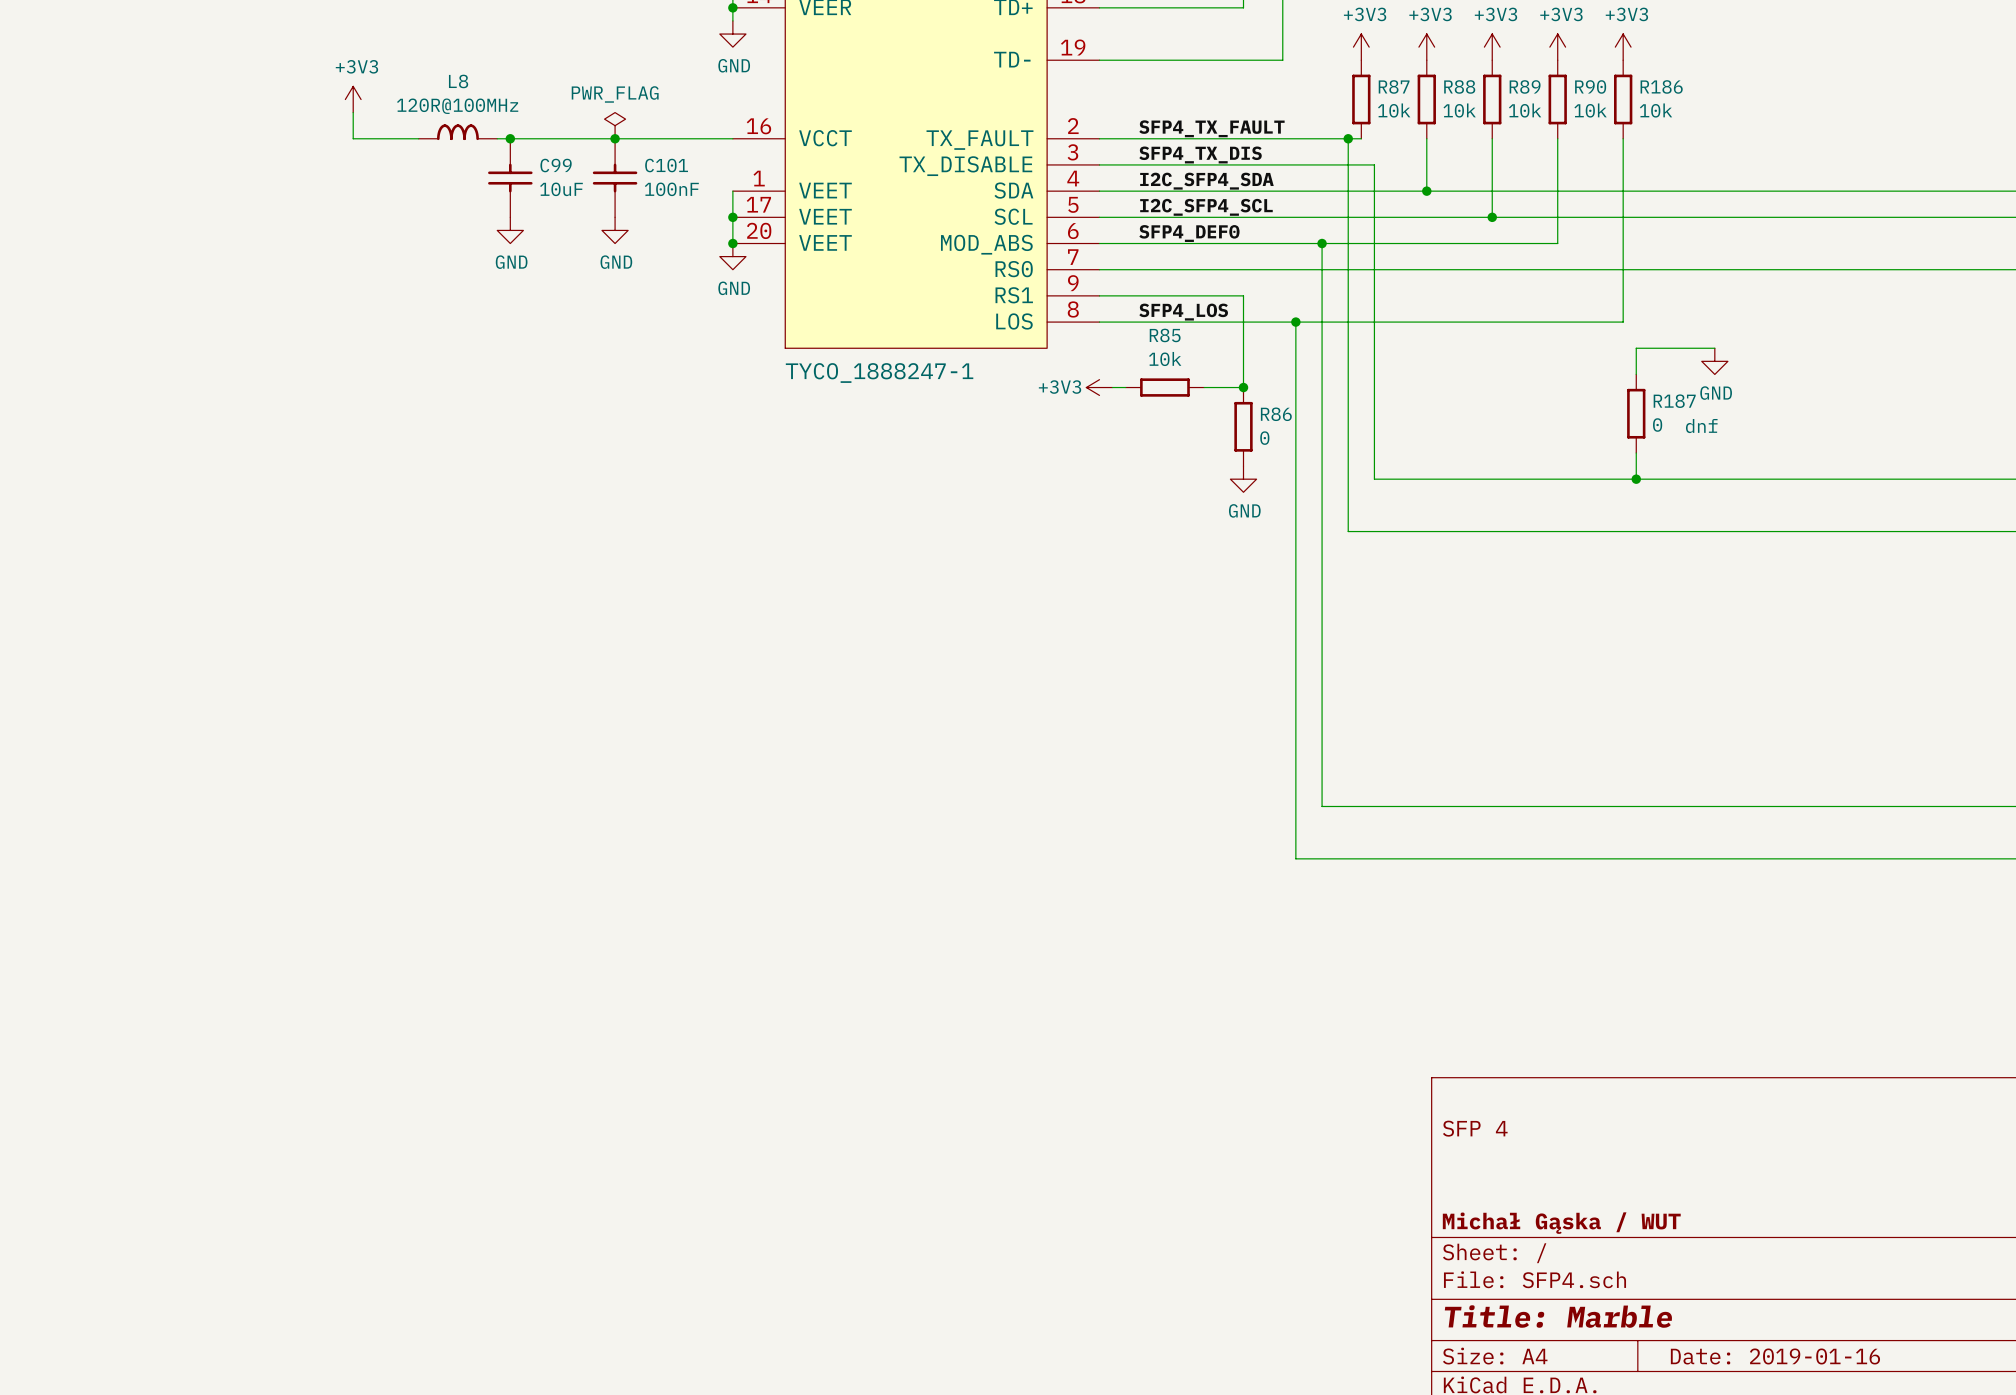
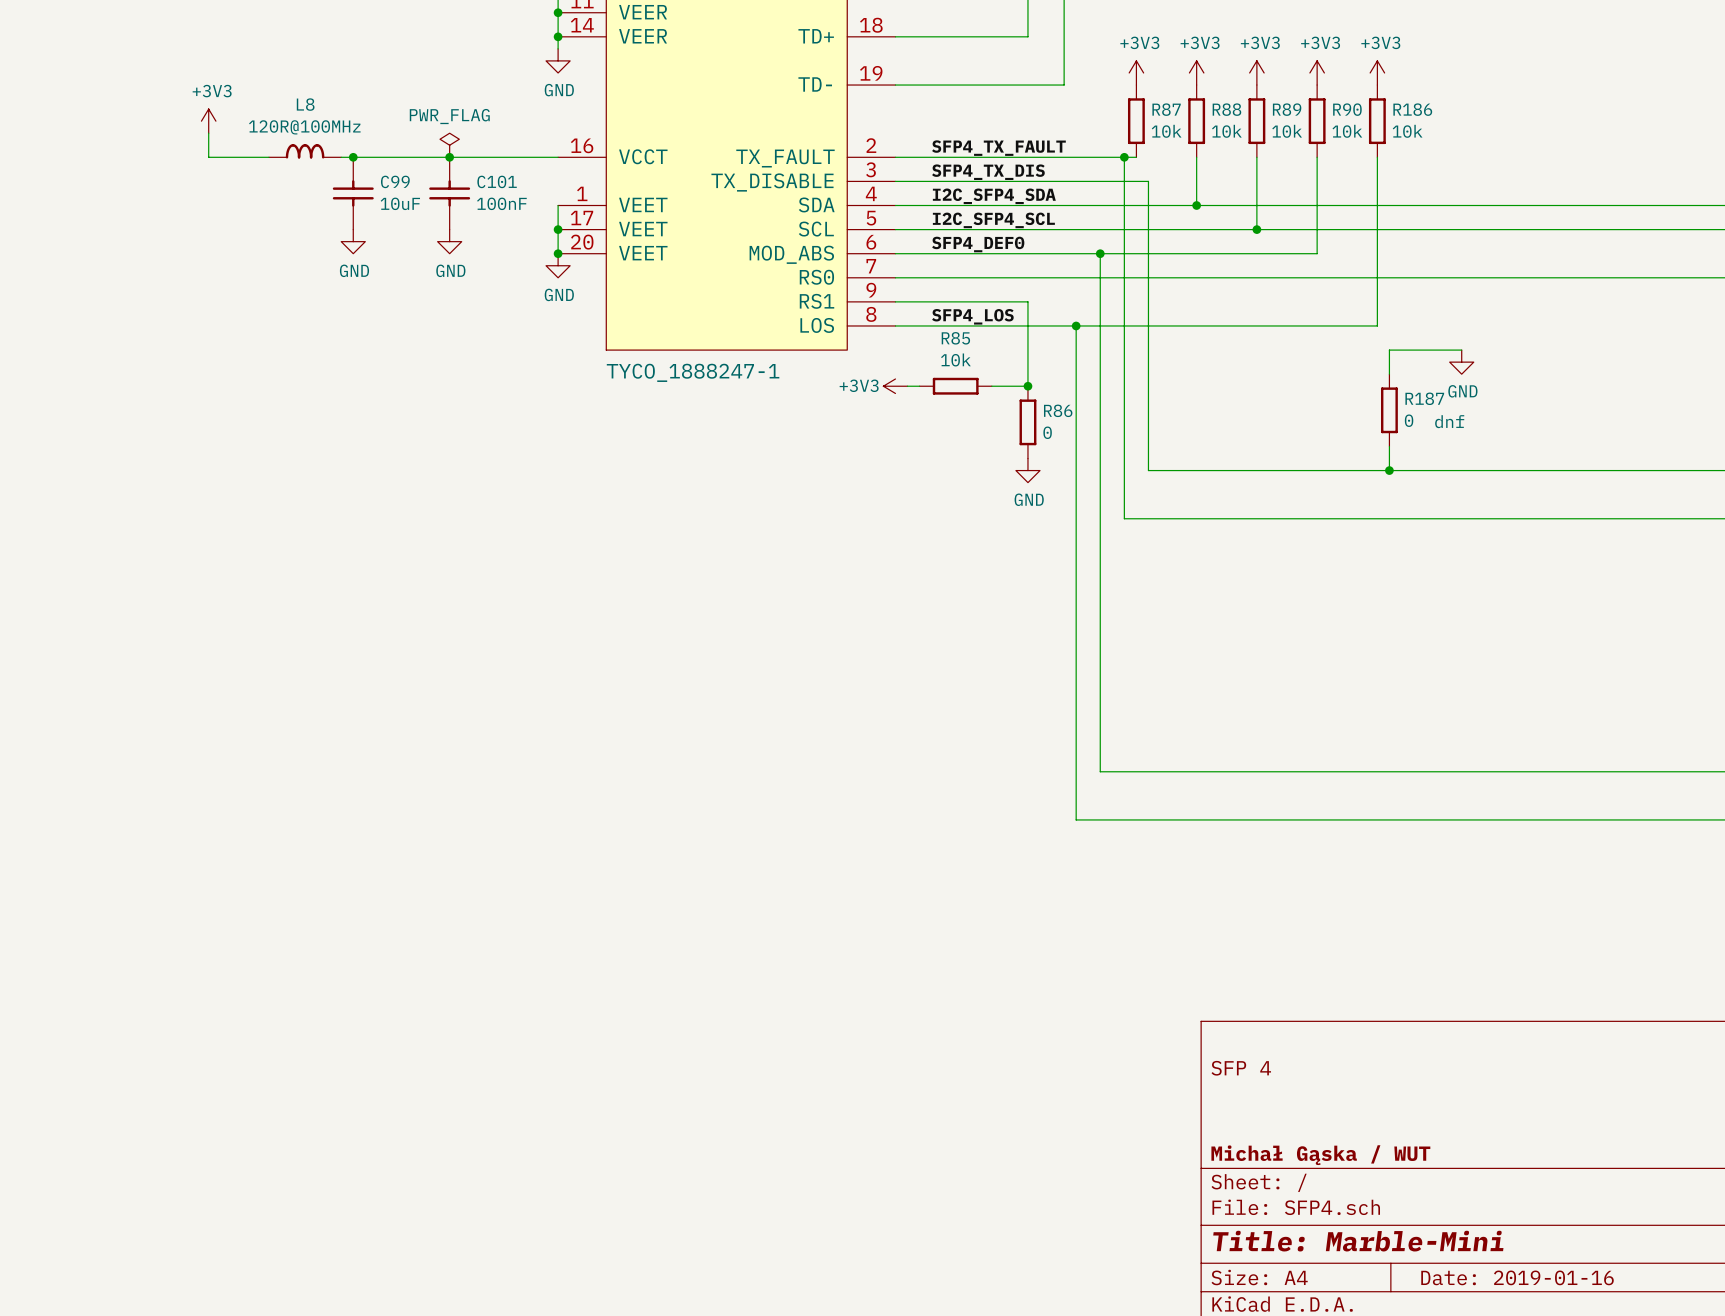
title block: Title: Marble (1558, 1316) -> Title: Marble-Mini (1358, 1241)

